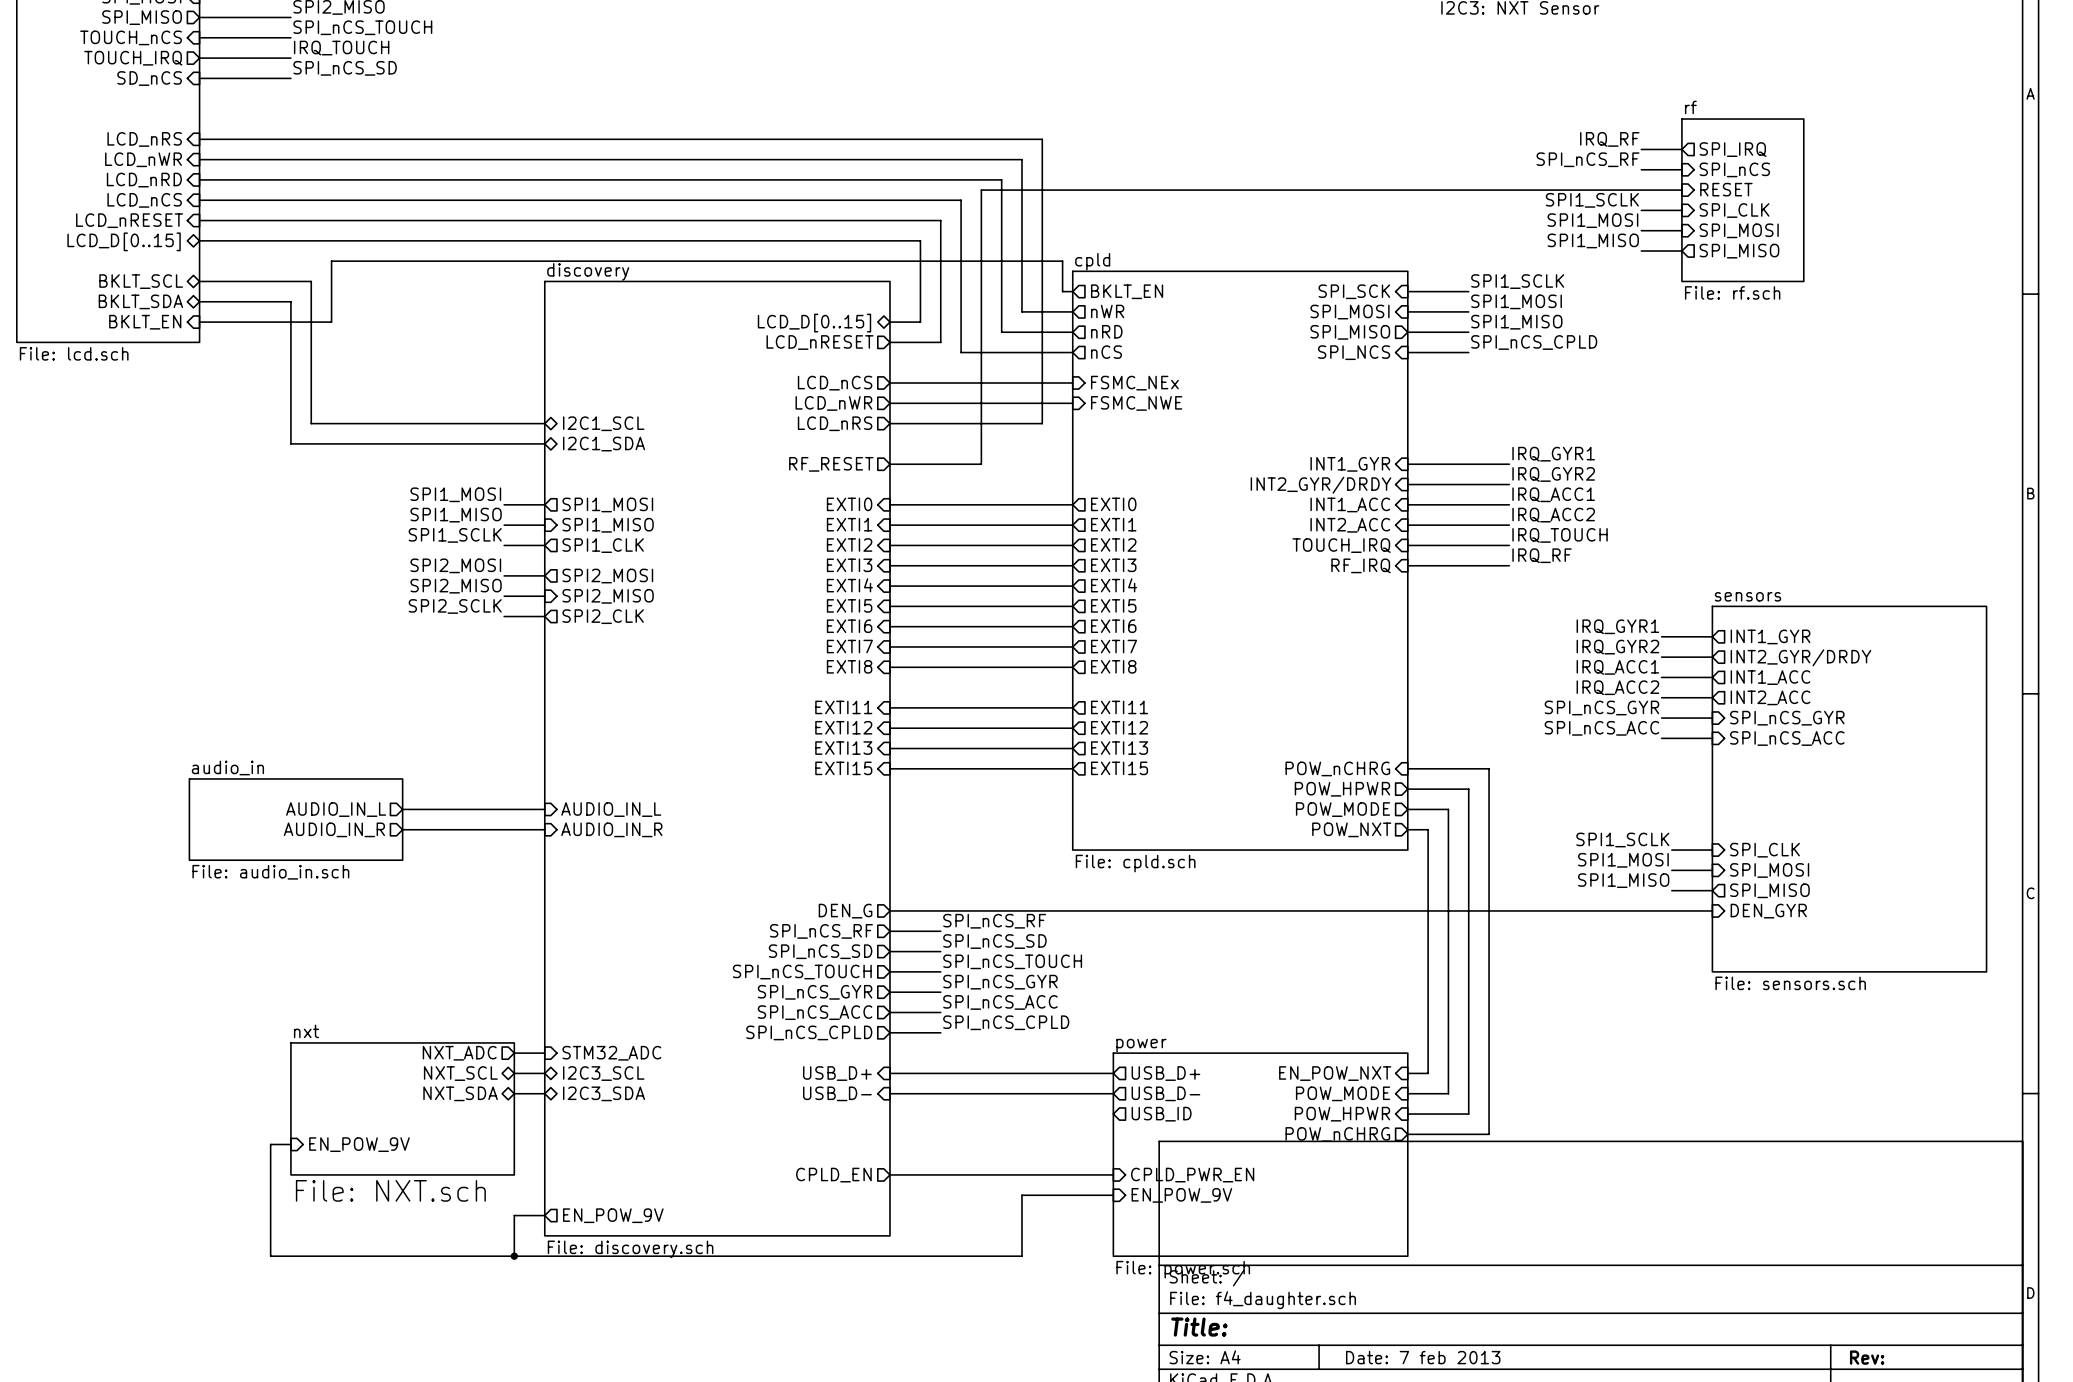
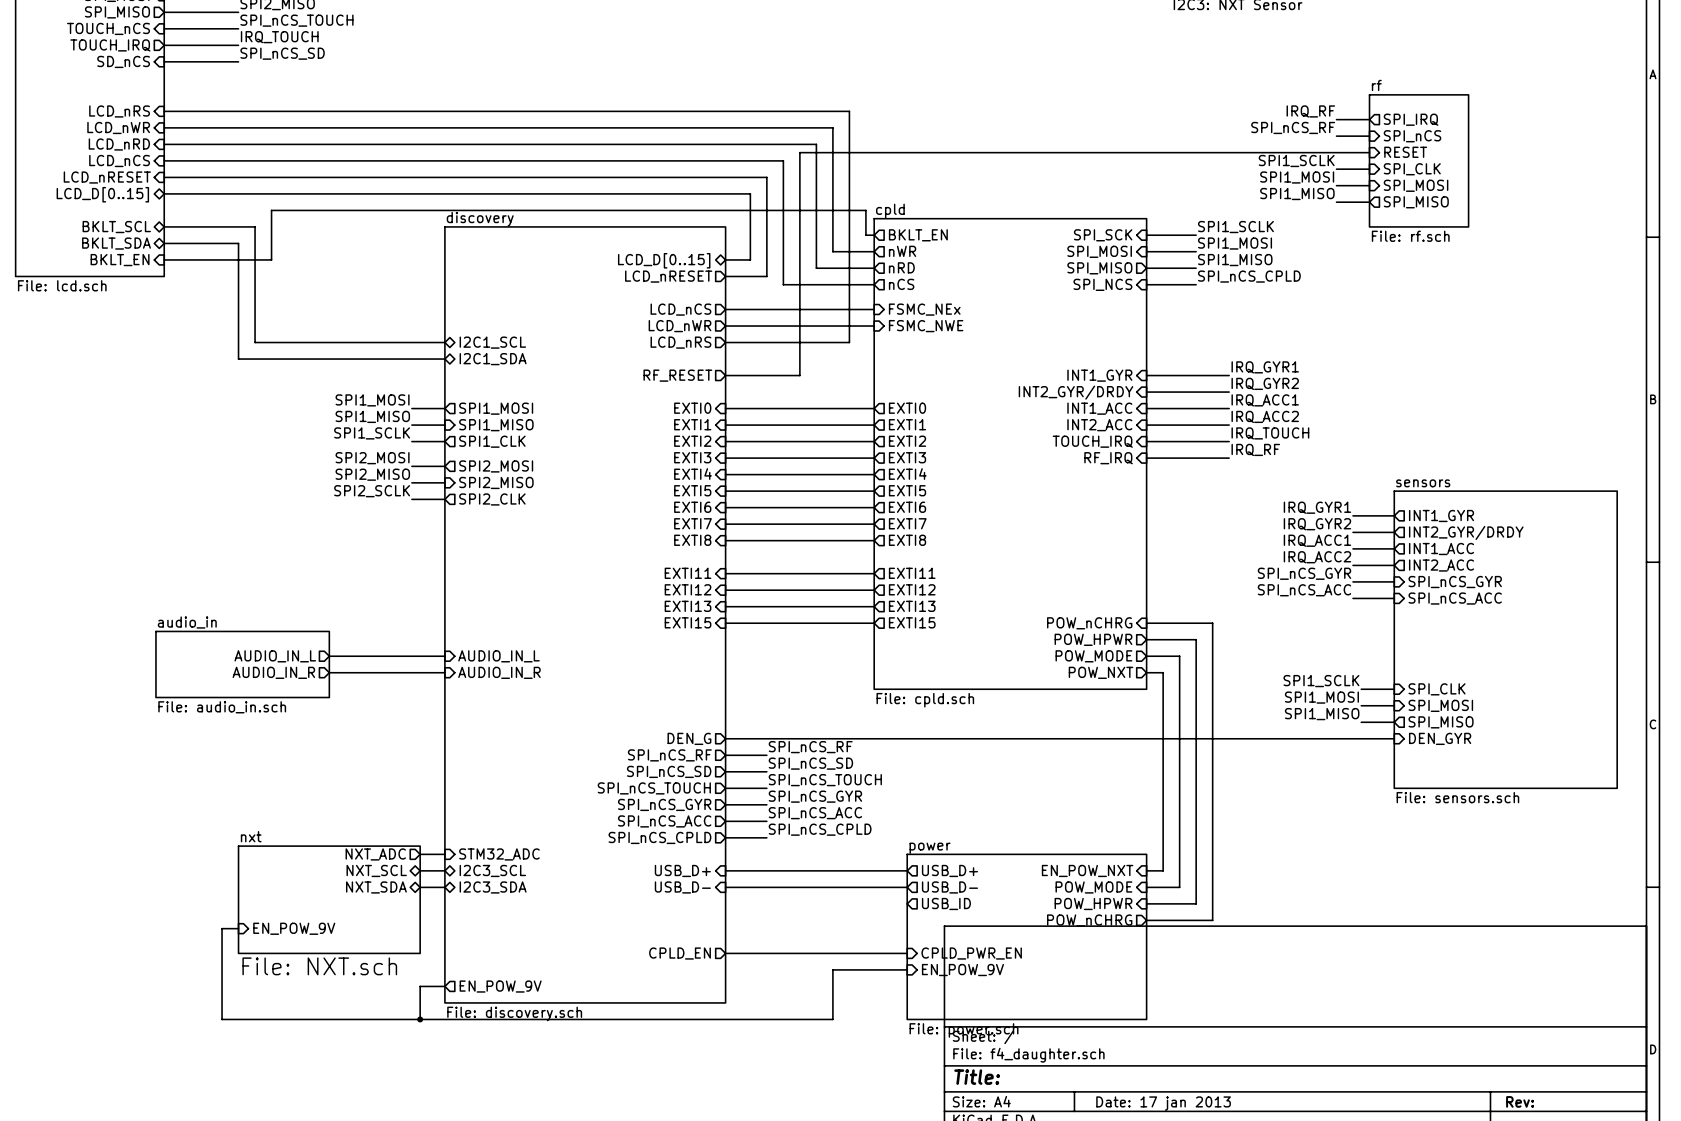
title block: Date: 7 feb 2013 (1423, 1357) -> Date: 17 jan 2013 (1163, 1103)

